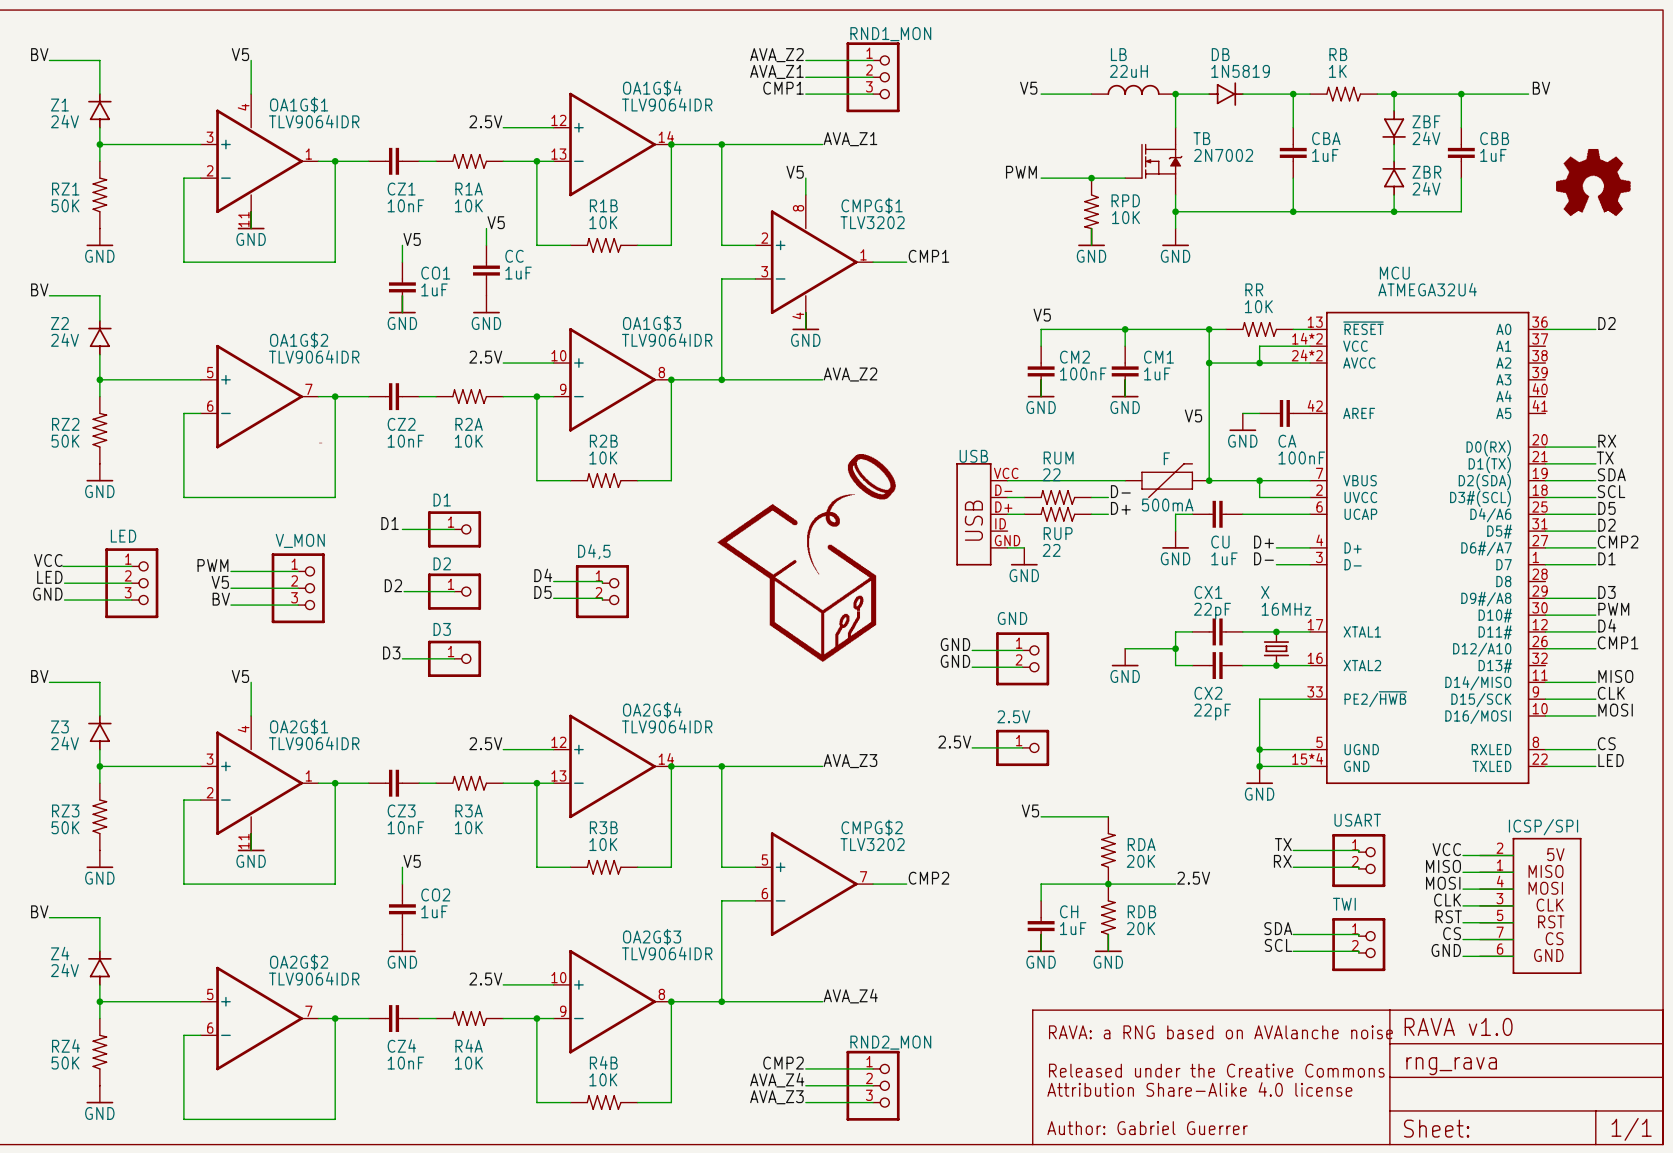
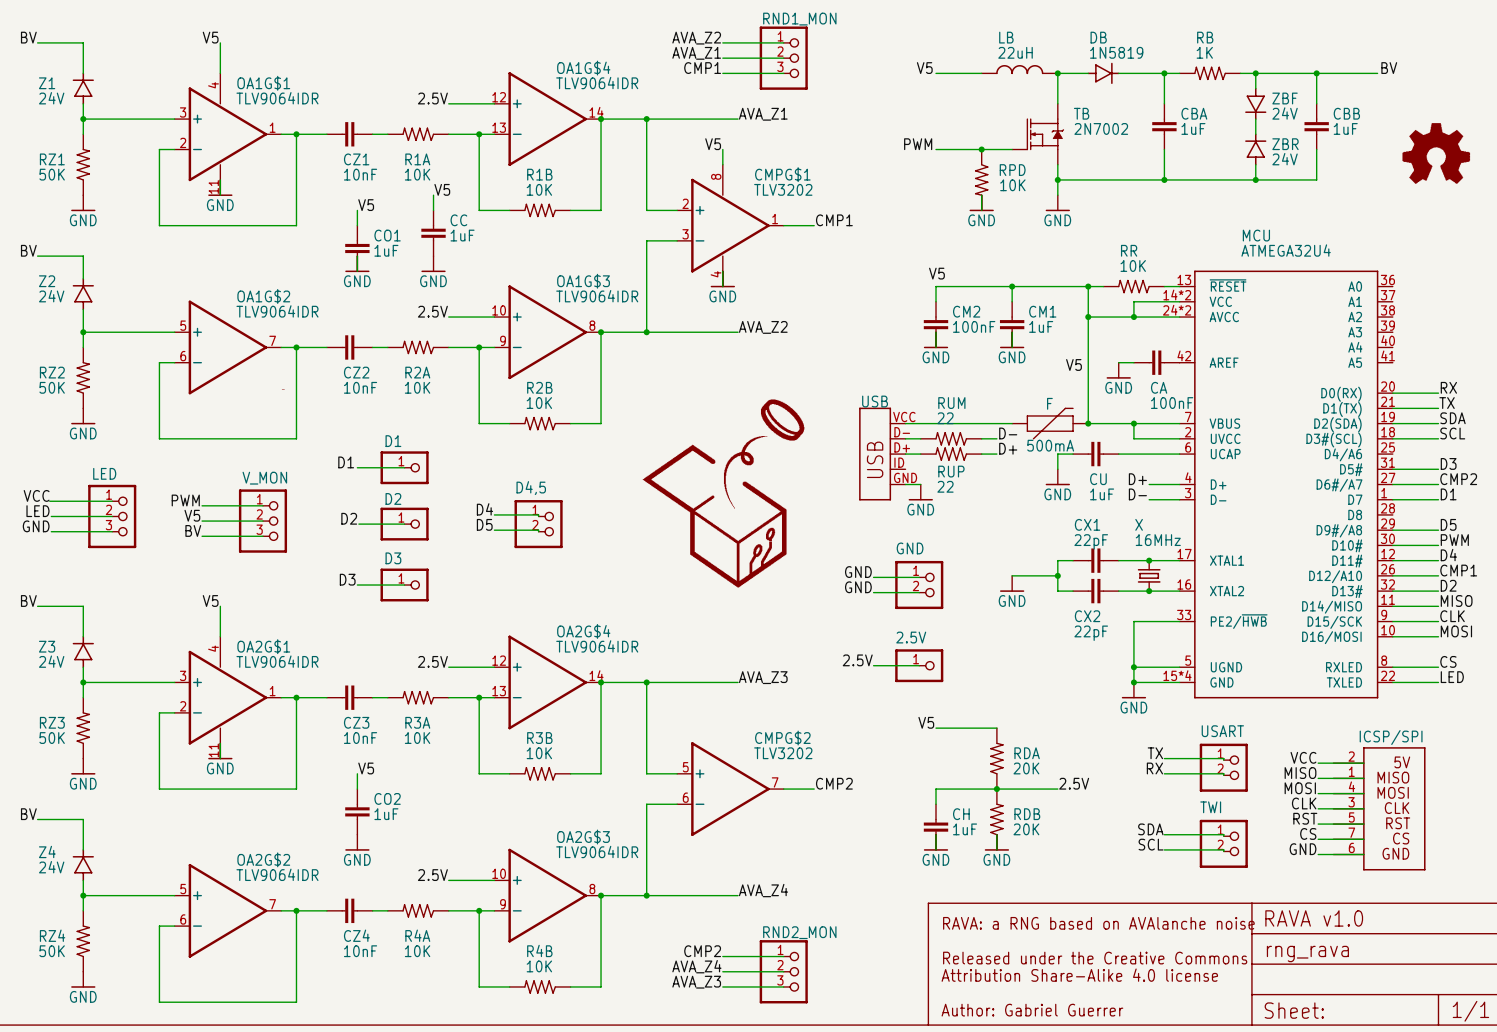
label: D2 (1607, 323) -> none
wire: (1545, 329) (1595, 329) -> none
label: D5 (1607, 508) -> none
wire: (1545, 514) (1595, 514) -> (1392, 591) (1438, 591)
label: D2 (1607, 525) -> D3 (1448, 463)
label: D3 (1607, 592) -> D5 (1448, 524)
label: none -> D2 (1448, 585)

